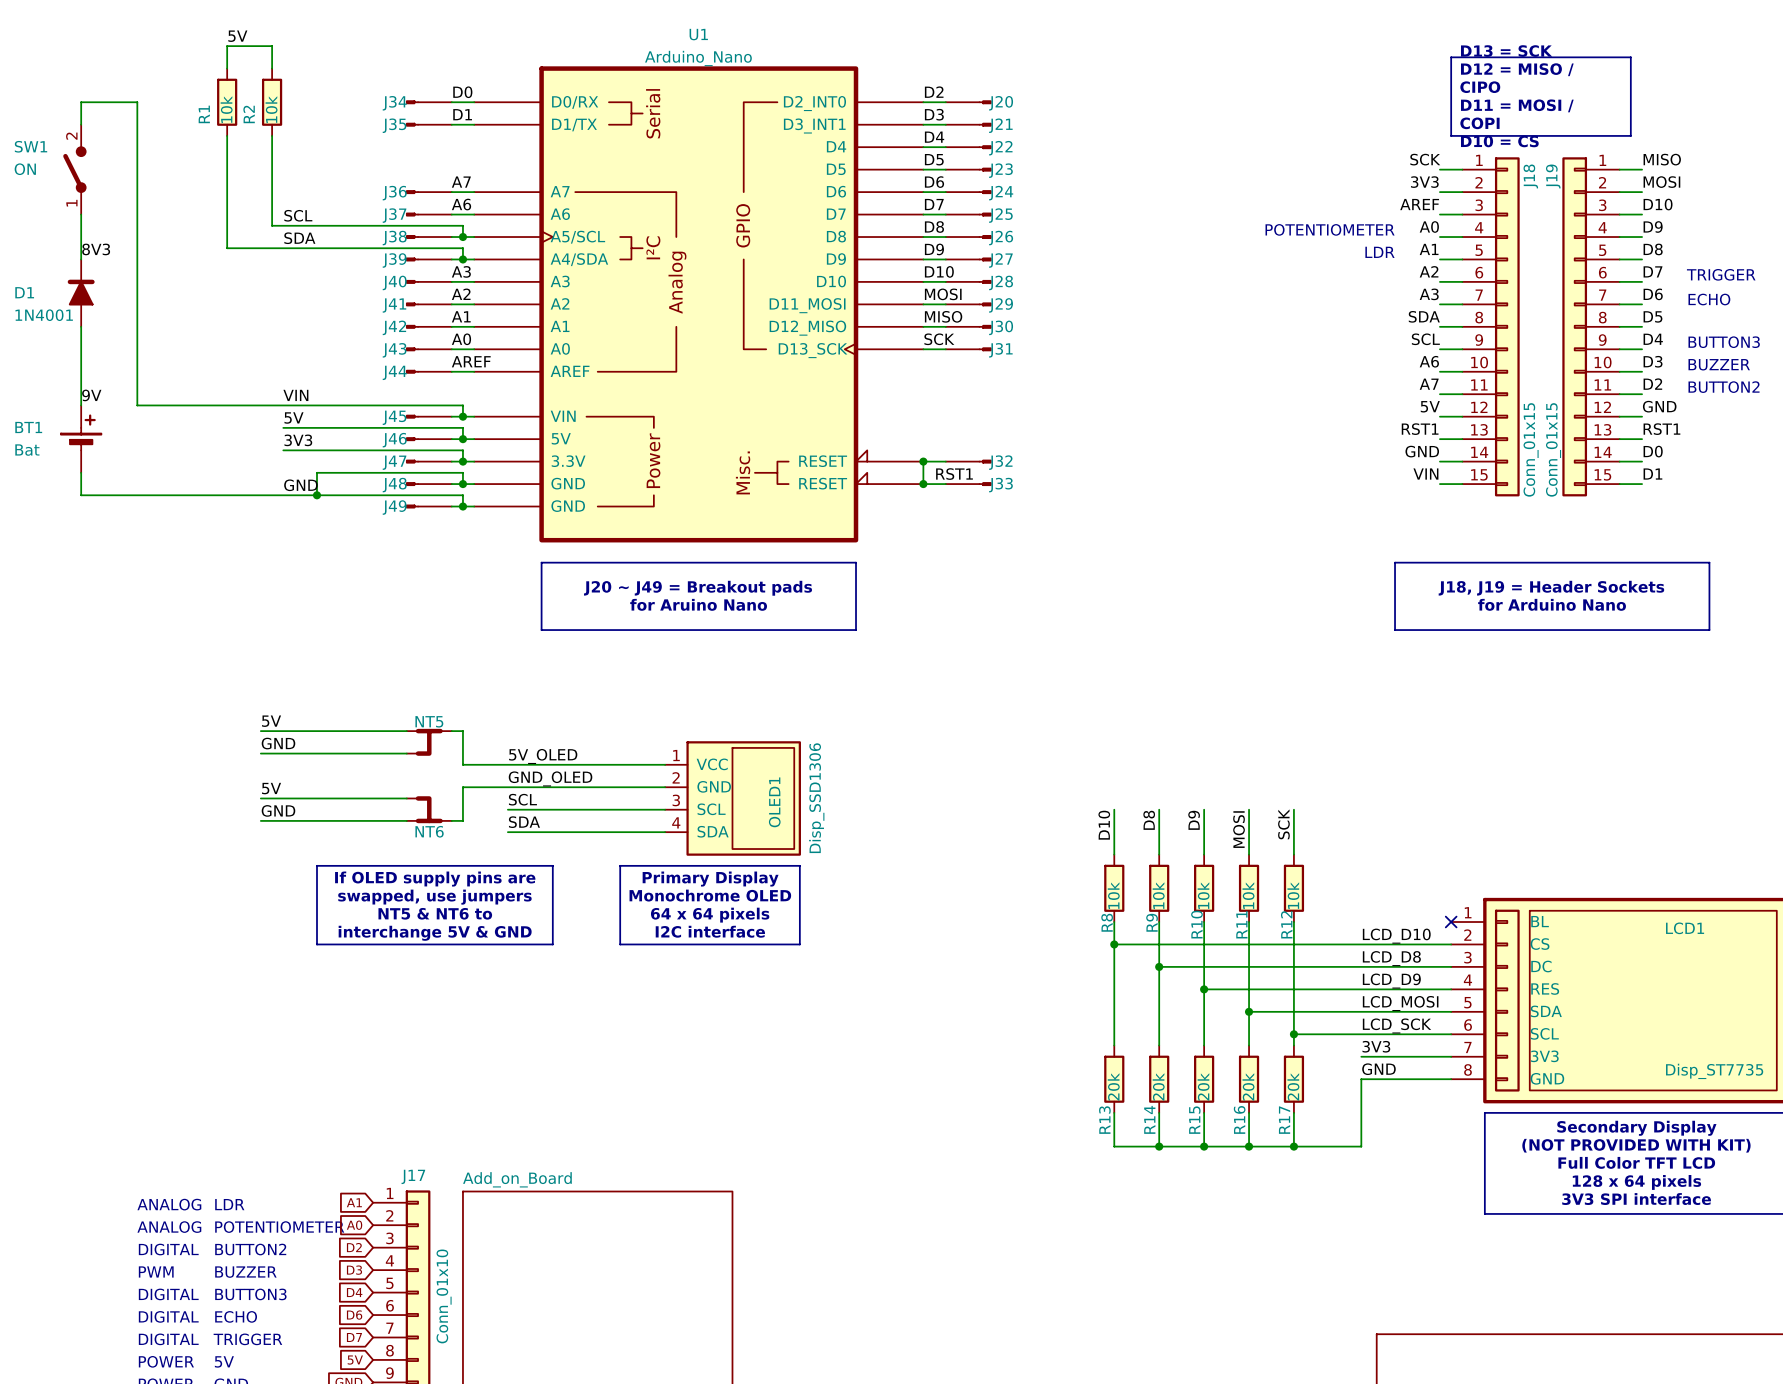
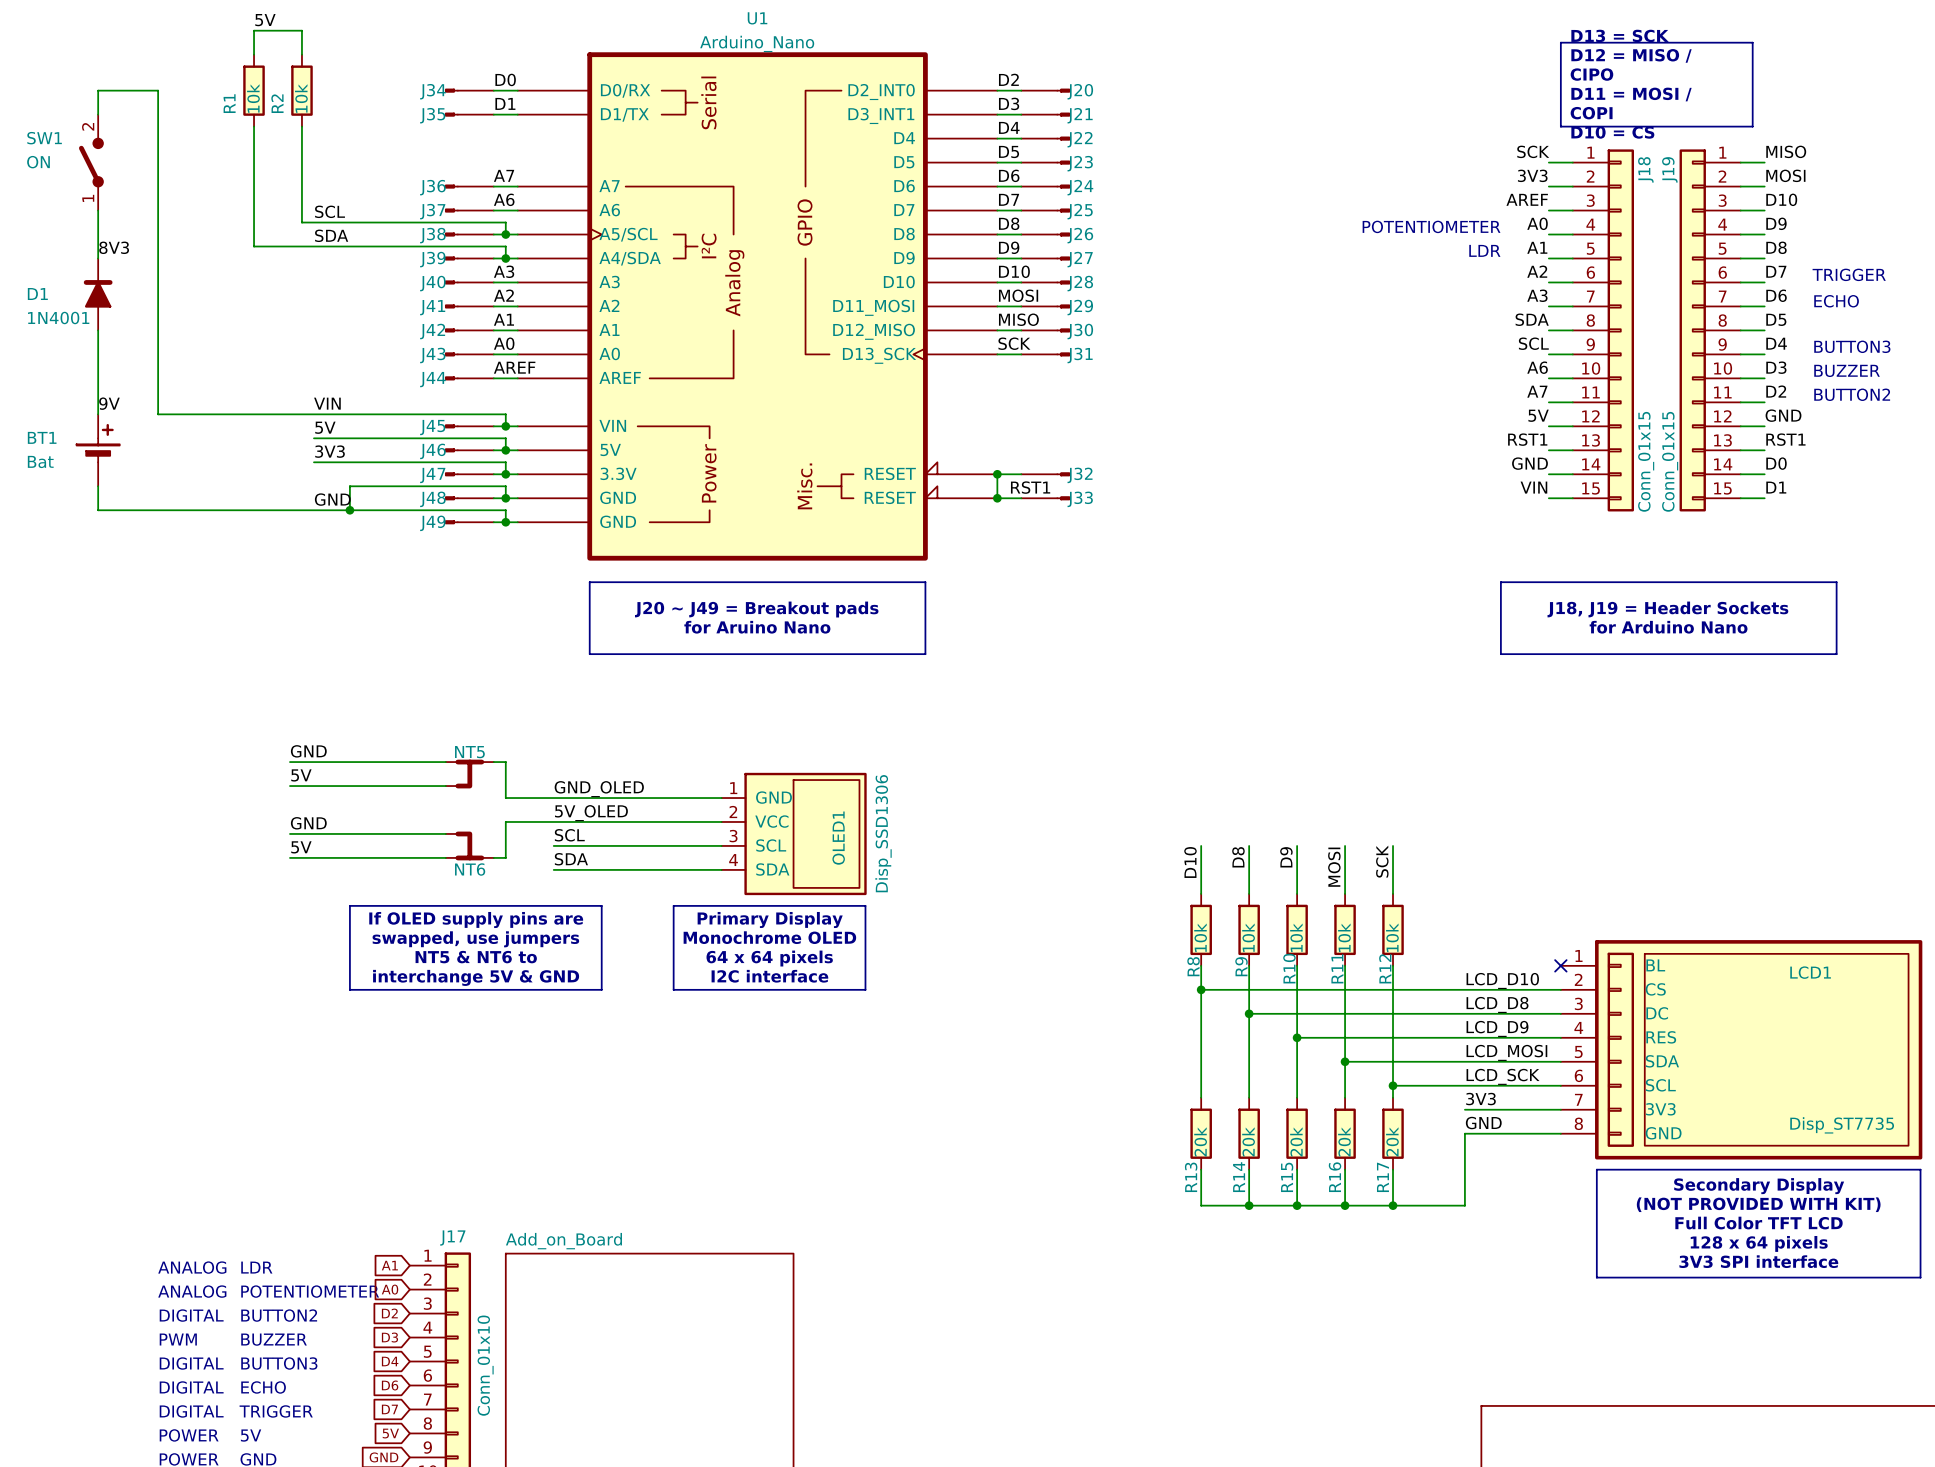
label: 5V (271, 721) -> GND (308, 751)
label: GND (278, 743) -> 5V (301, 775)
label: 5V_OLED (543, 756) -> GND_OLED (599, 789)
OLED1 pin name: VCC (712, 764) -> GND (774, 797)
label: GND_OLED (550, 778) -> 5V_OLED (591, 813)
OLED1 pin name: GND (714, 786) -> VCC (771, 821)
label: 5V (271, 788) -> GND (308, 823)
label: GND (278, 810) -> 5V (301, 847)

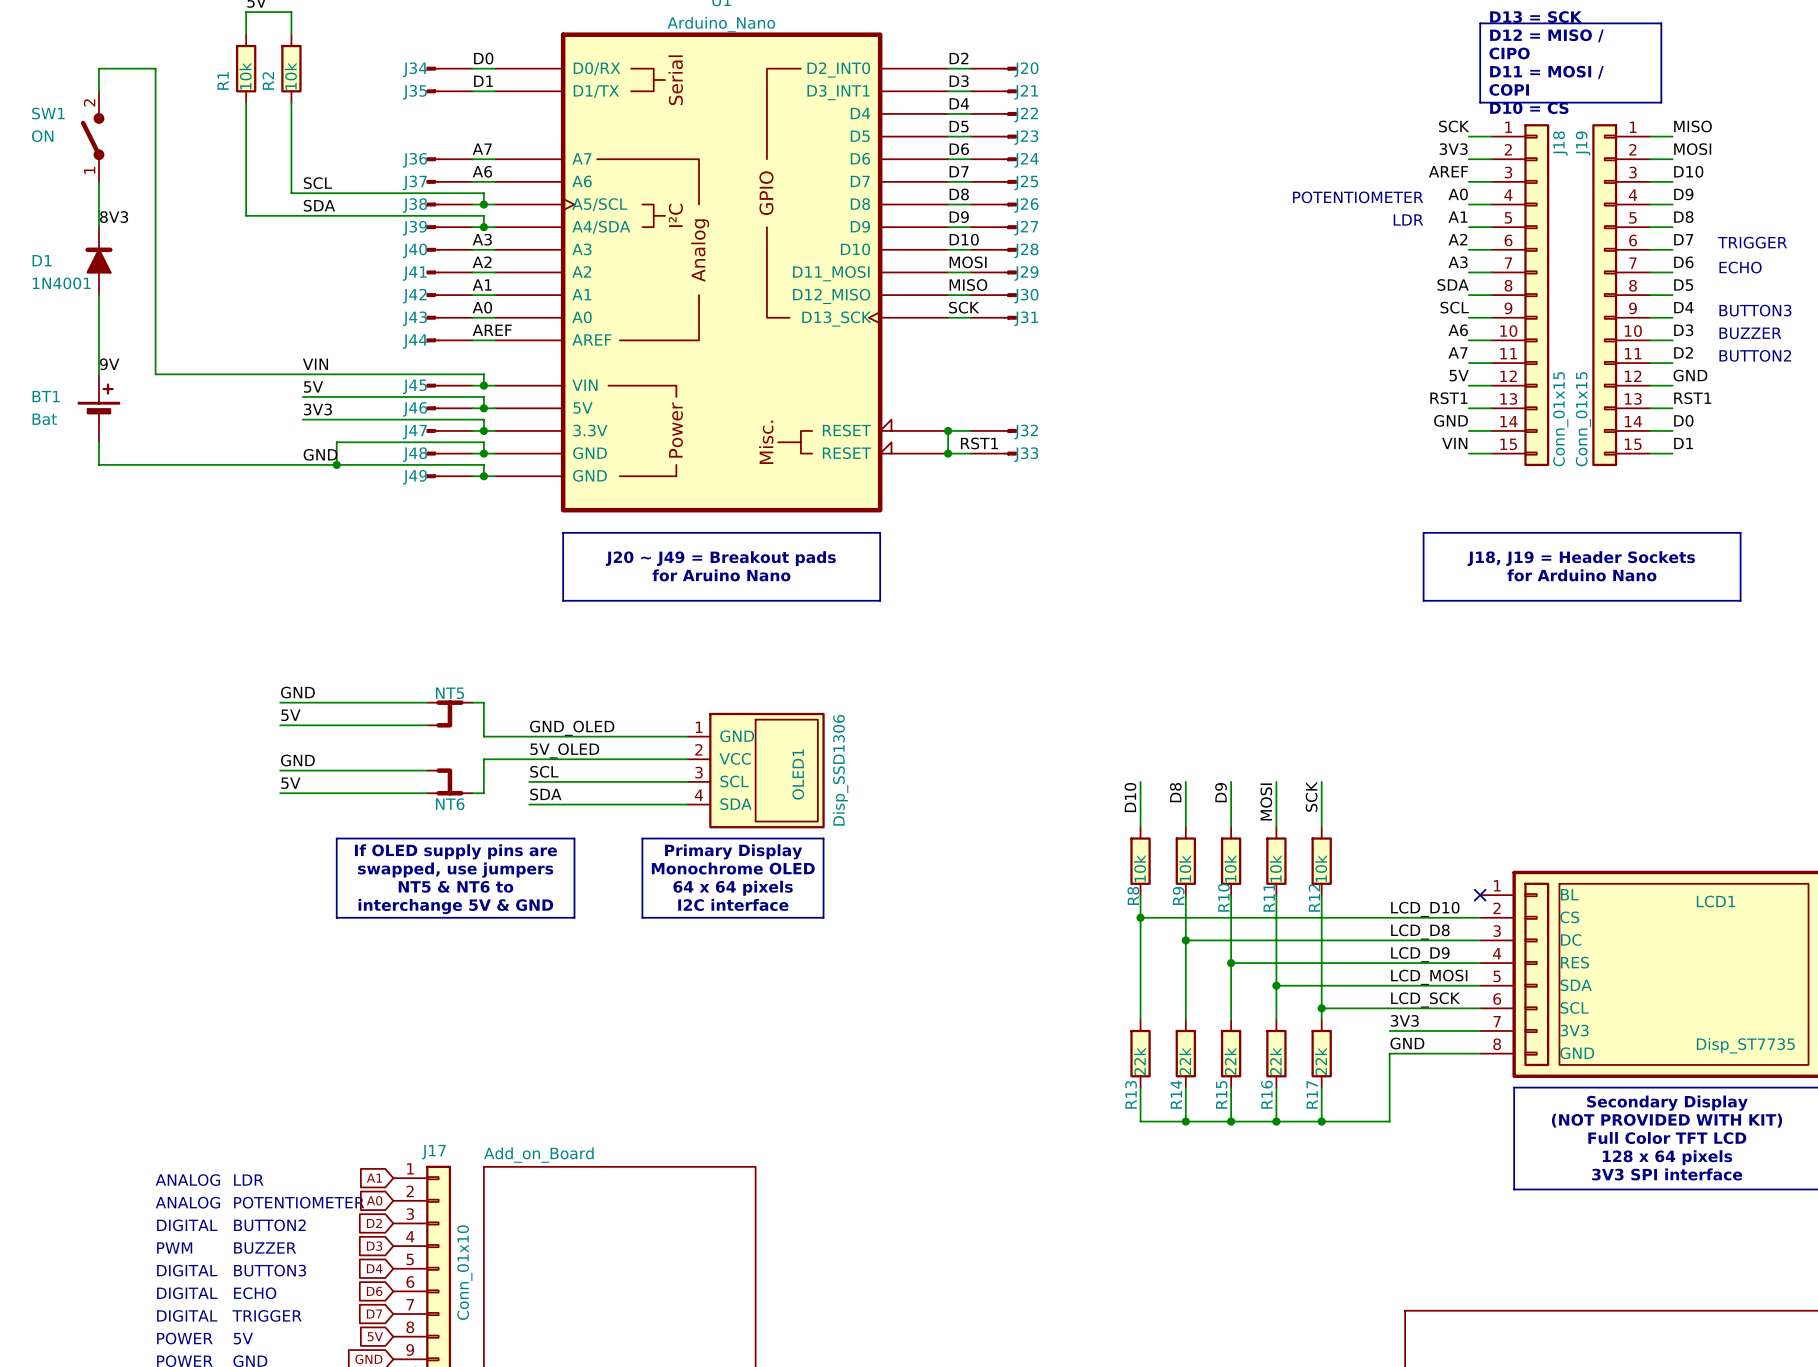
R13 value: 20k (1200, 1141) -> 22k (1139, 1061)
R14 value: 20k (1248, 1141) -> 22k (1185, 1061)
R15 value: 20k (1296, 1141) -> 22k (1230, 1061)
R16 value: 20k (1344, 1141) -> 22k (1275, 1061)
R17 value: 20k (1392, 1141) -> 22k (1321, 1061)

